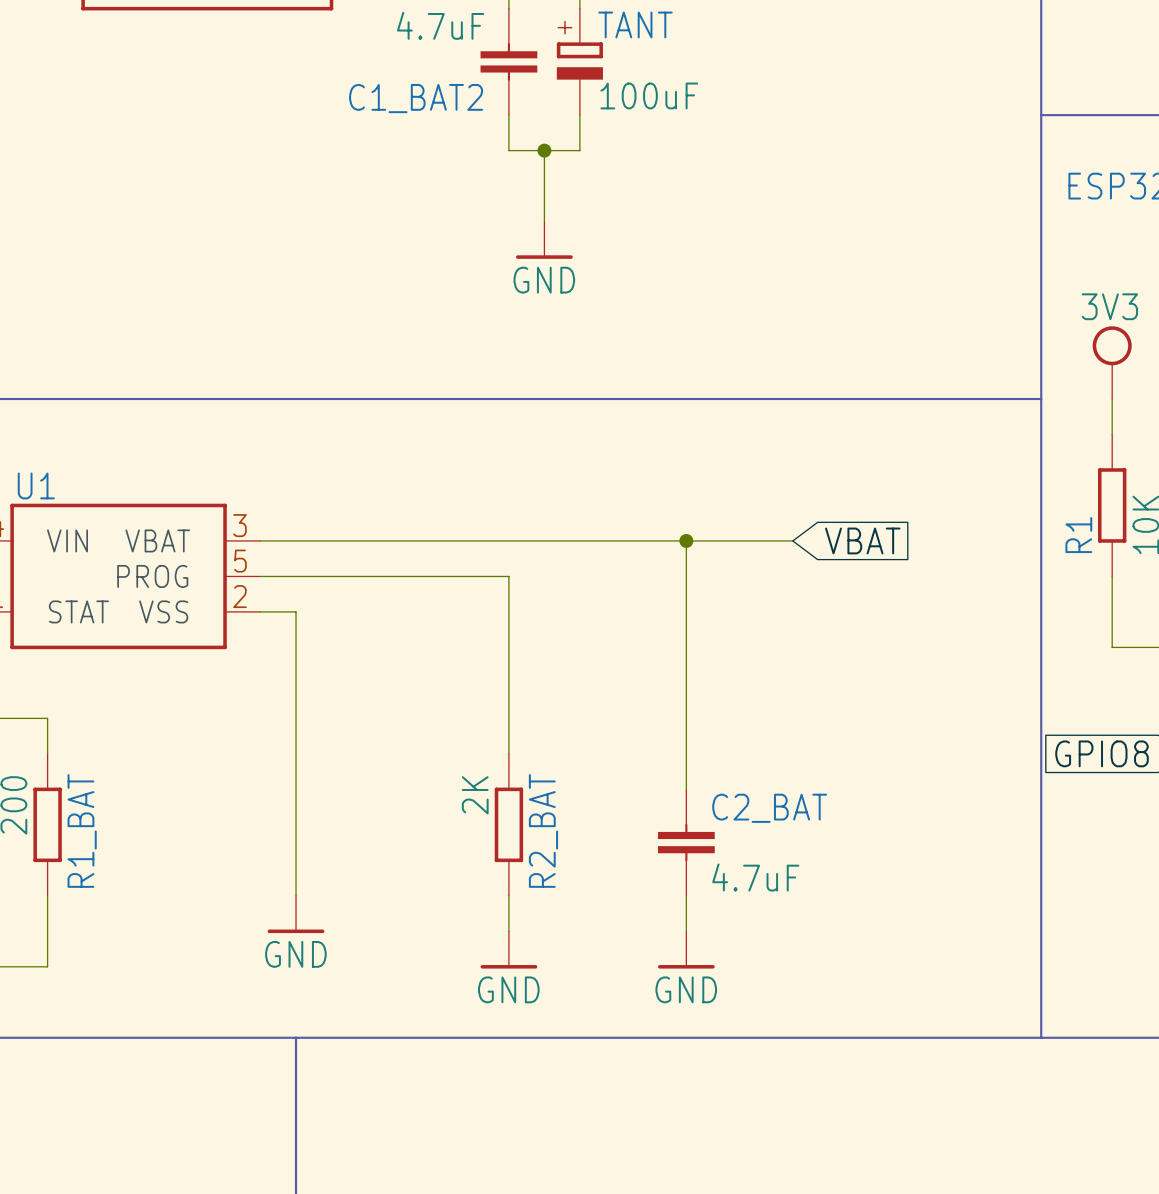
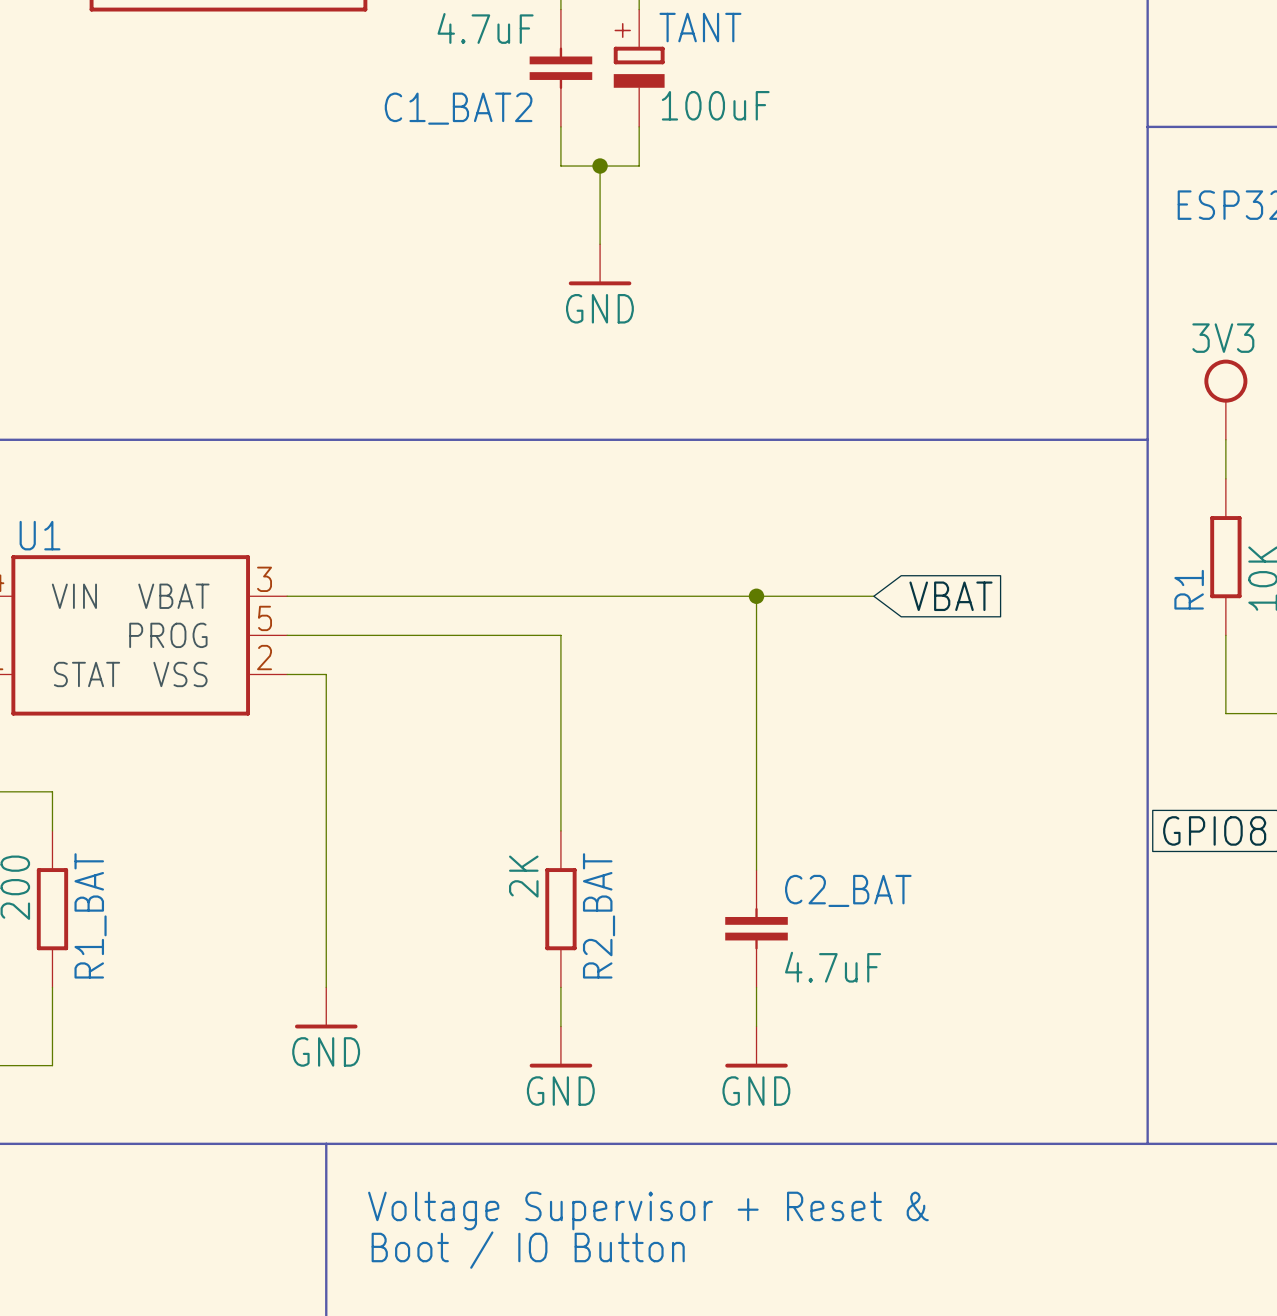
text: none -> Voltage Supervisor + Reset & (648, 1210)
text: none -> Boot / IO Button (528, 1250)

